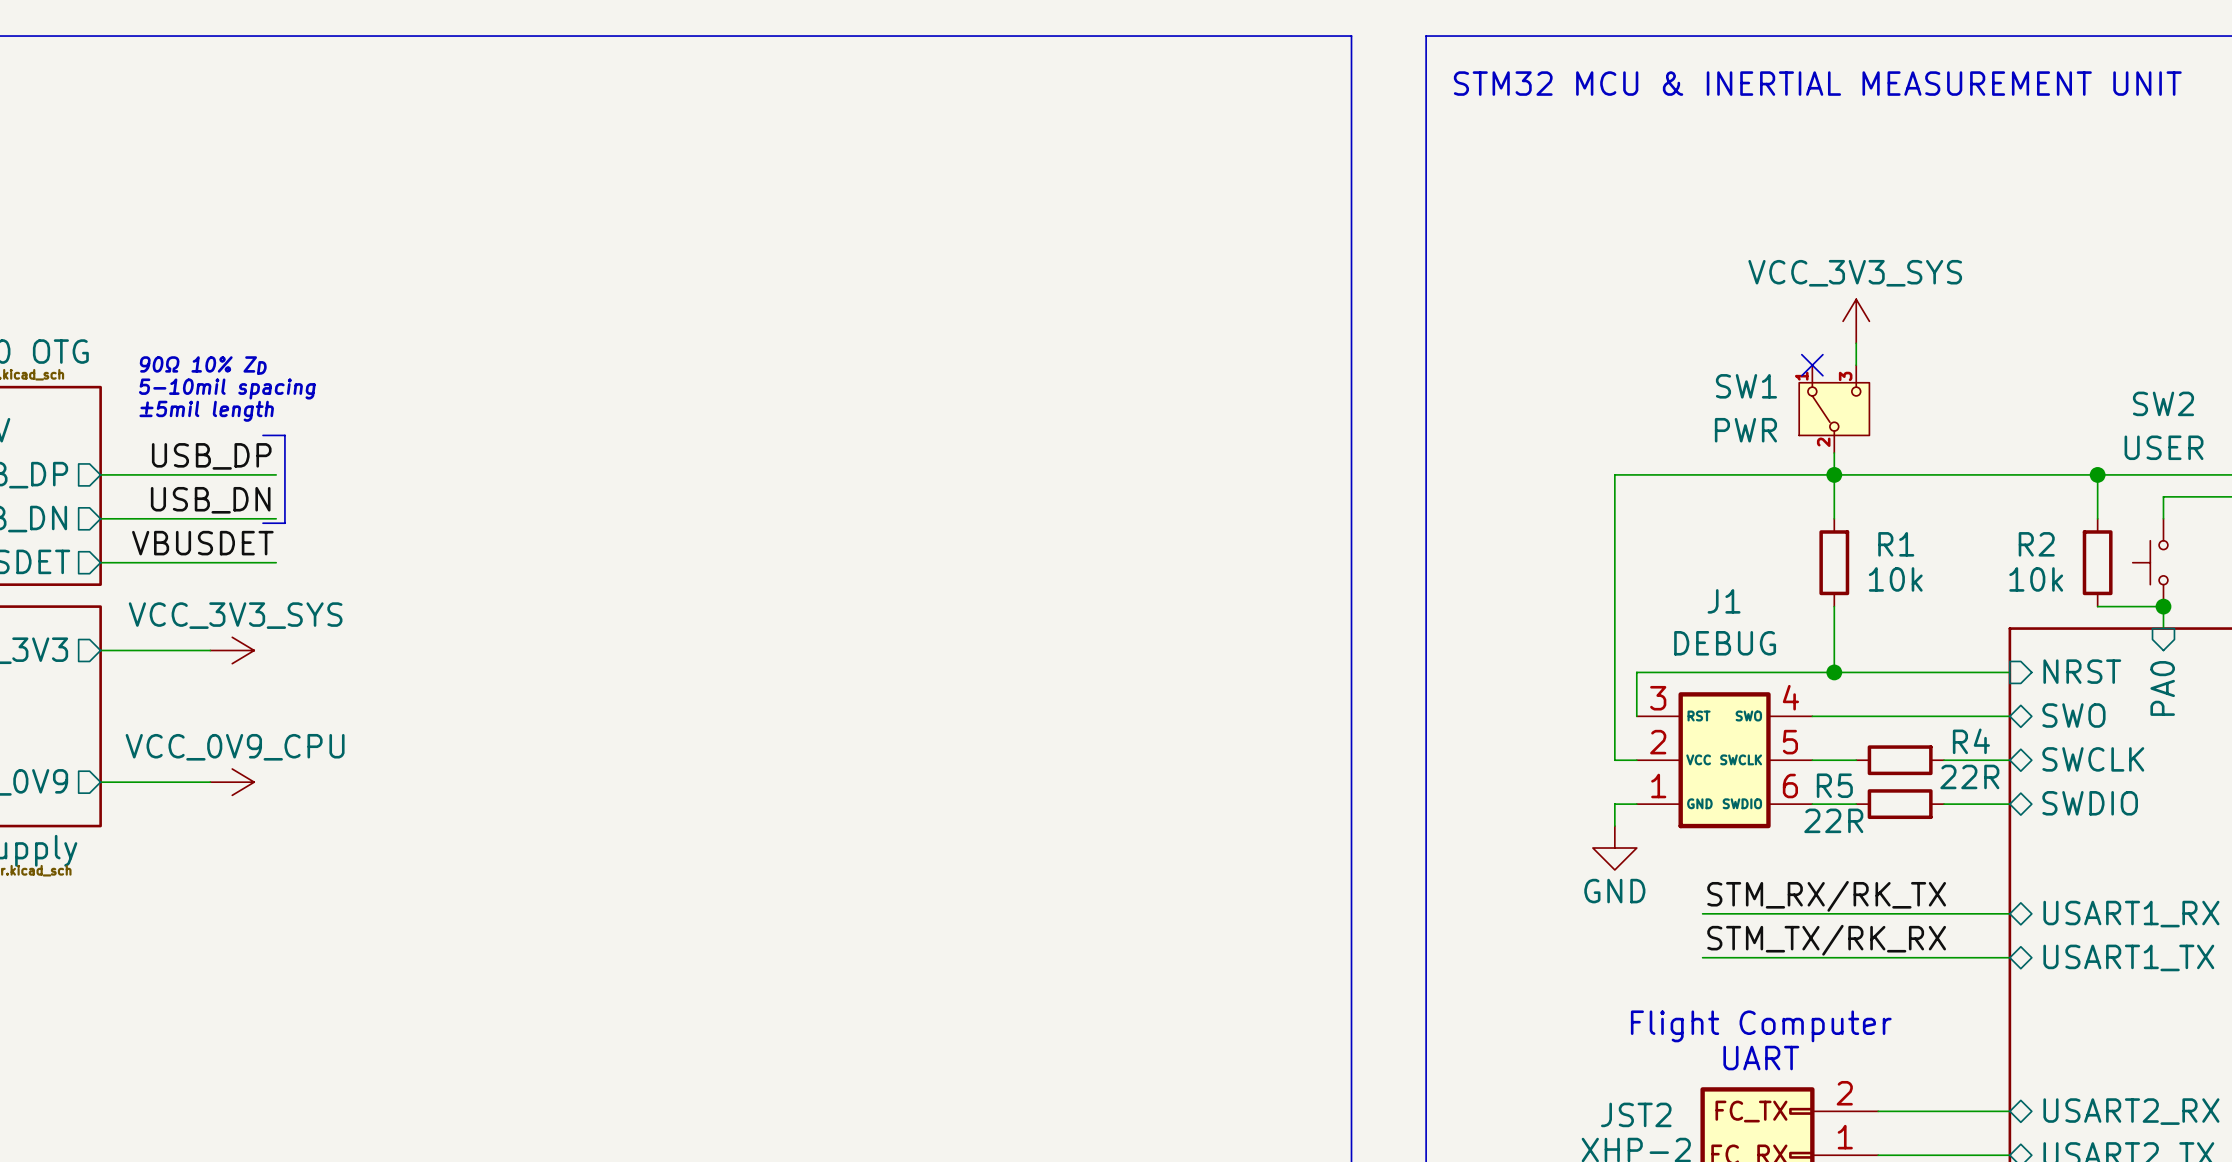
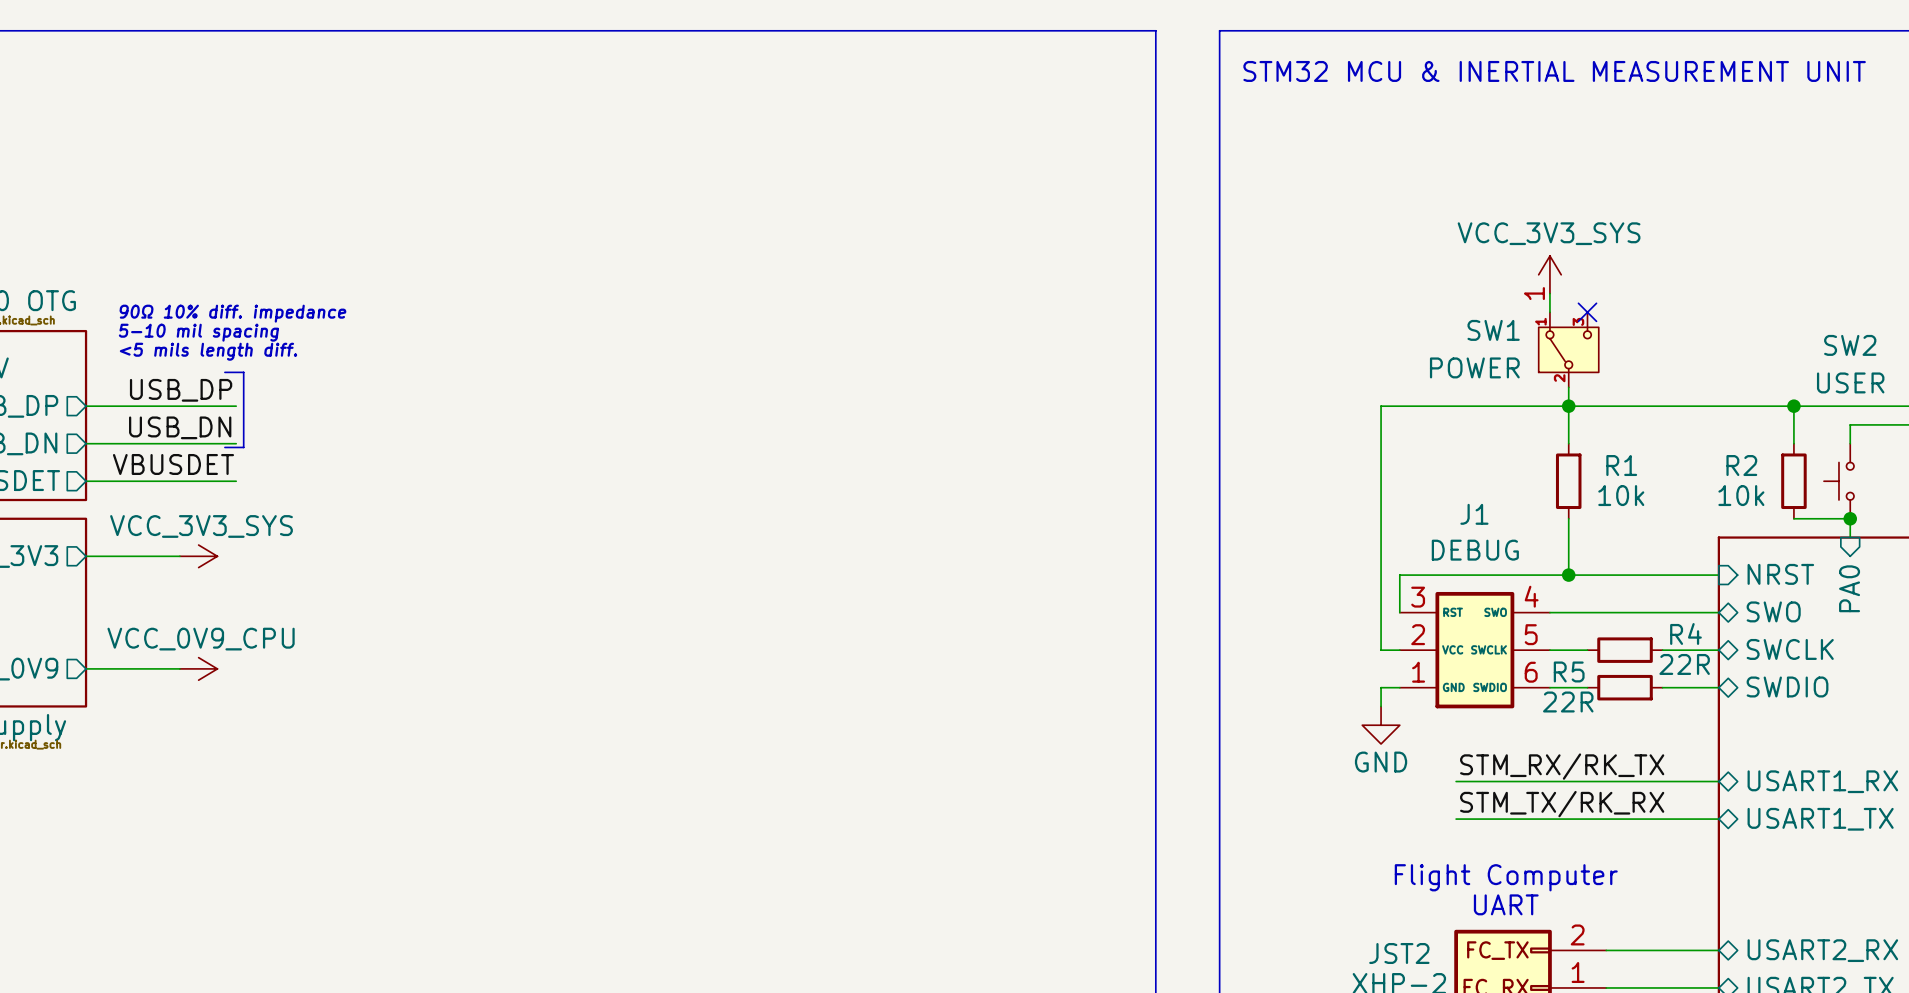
power symbol: none -> VCC_3V3_SYS (1549, 274)
power symbol: VCC_3V3_SYS (1856, 321) -> none
wire: (1856, 343) (1856, 365) -> (1549, 293) (1549, 312)
text: 90Ω 10% ZD (203, 365) -> 90Ω 10% diff. impedance (232, 313)
no-connect mark position: (1812, 365) -> (1587, 312)
text: 5-10mil spacing (227, 389) -> 5-10 mil spacing (198, 332)
text: ±5mil length (206, 411) -> <5 mils length diff. (208, 351)
SW1 value: PWR (1745, 430) -> POWER (1474, 367)

